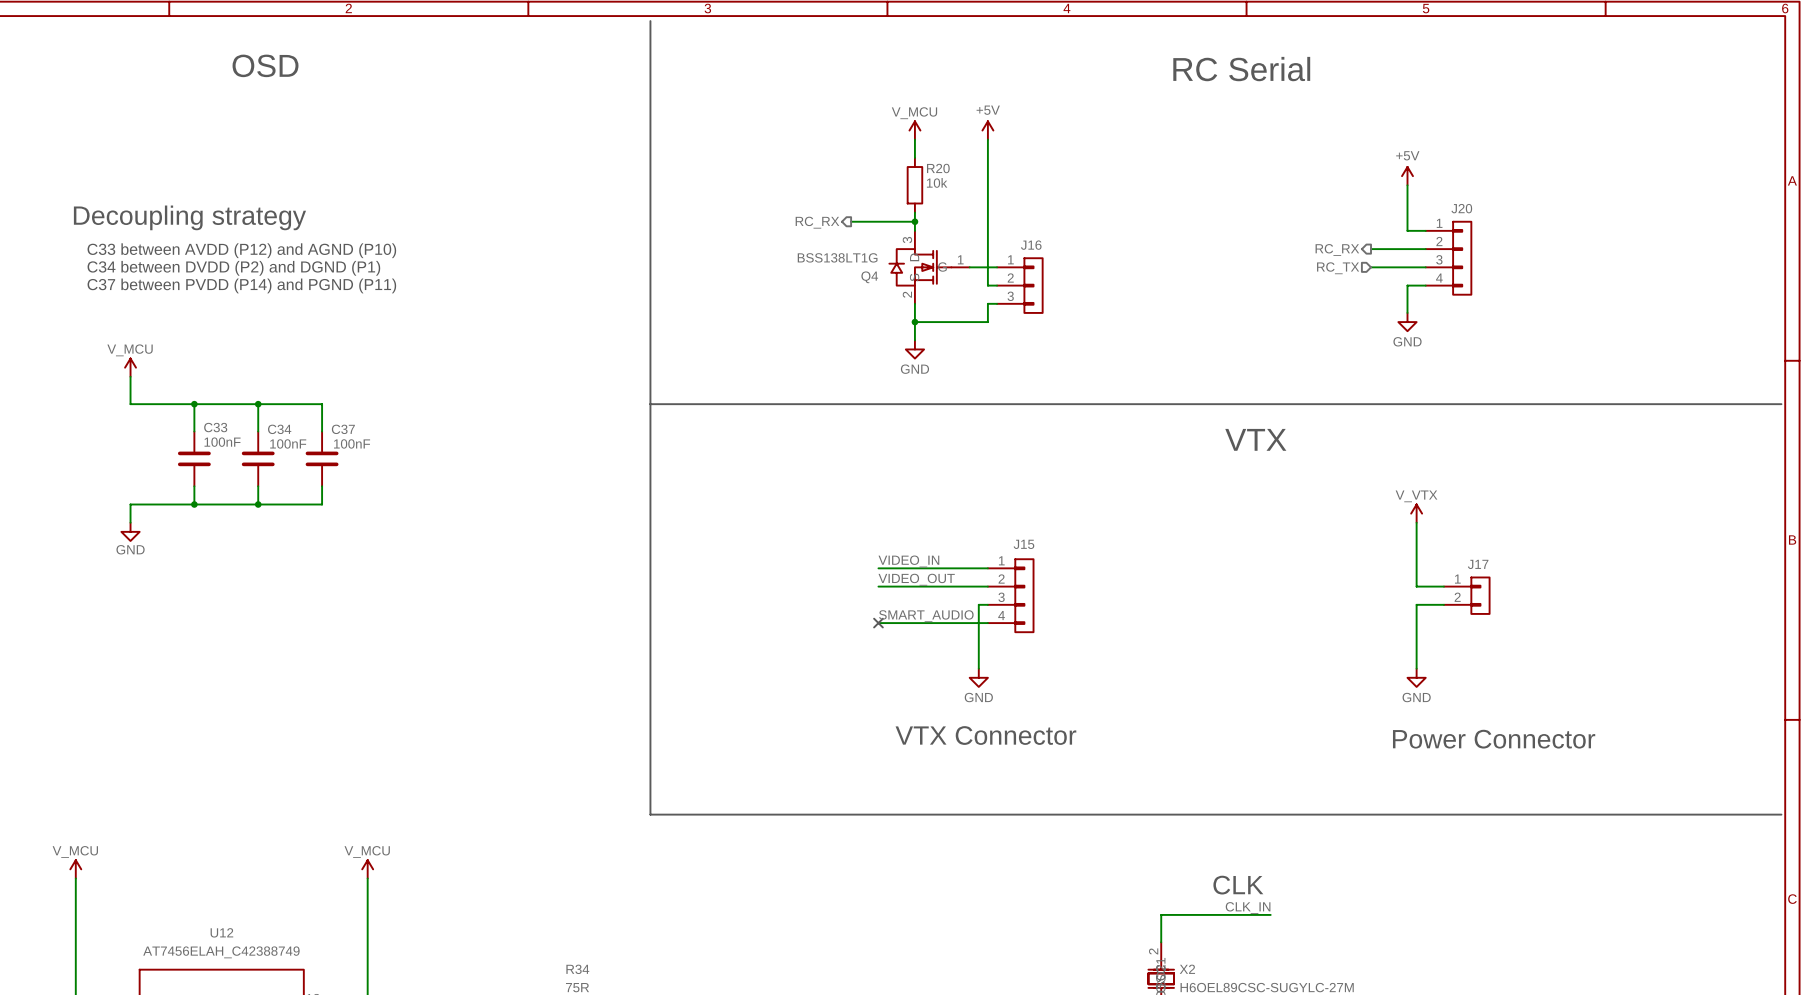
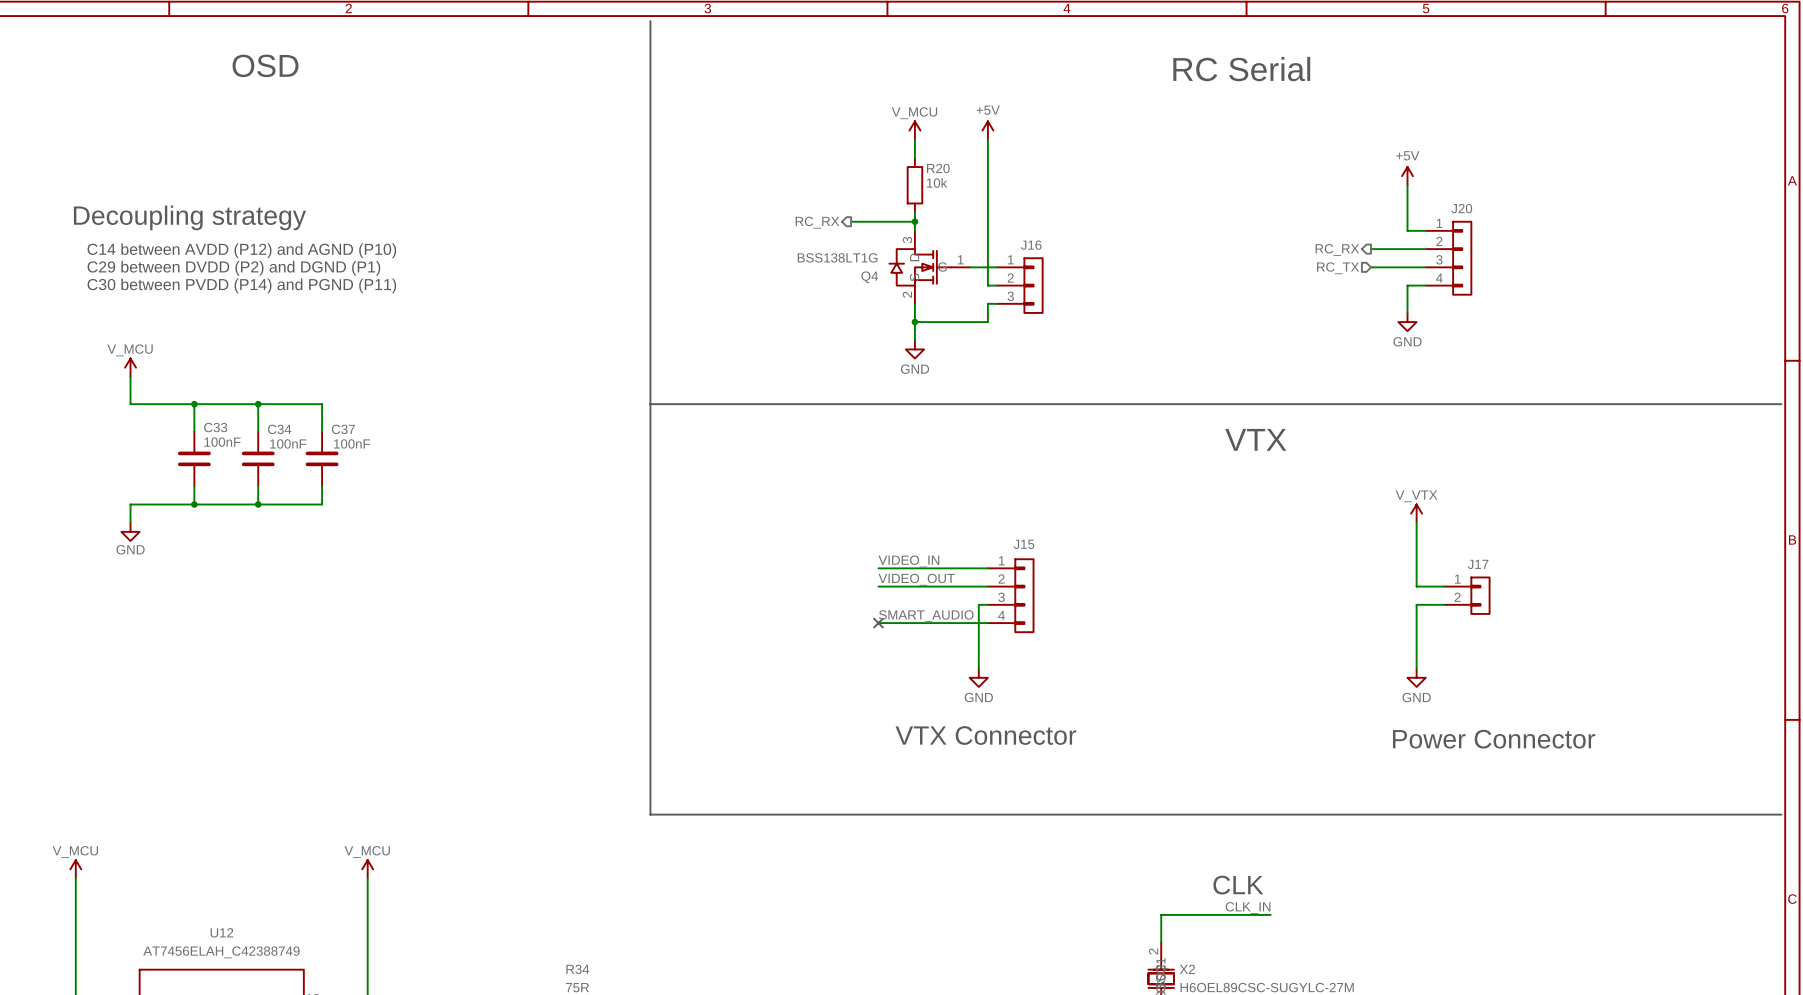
text: C33 between AVDD (P12) and AGND (P10) (241, 250) -> C14 between AVDD (P12) and AGND (P10) (241, 250)
text: C34 between DVDD (P2) and DGND (P1) (233, 268) -> C29 between DVDD (P2) and DGND (P1) (233, 268)
text: C37 between PVDD (P14) and PGND (P11) (241, 285) -> C30 between PVDD (P14) and PGND (P11) (241, 285)

